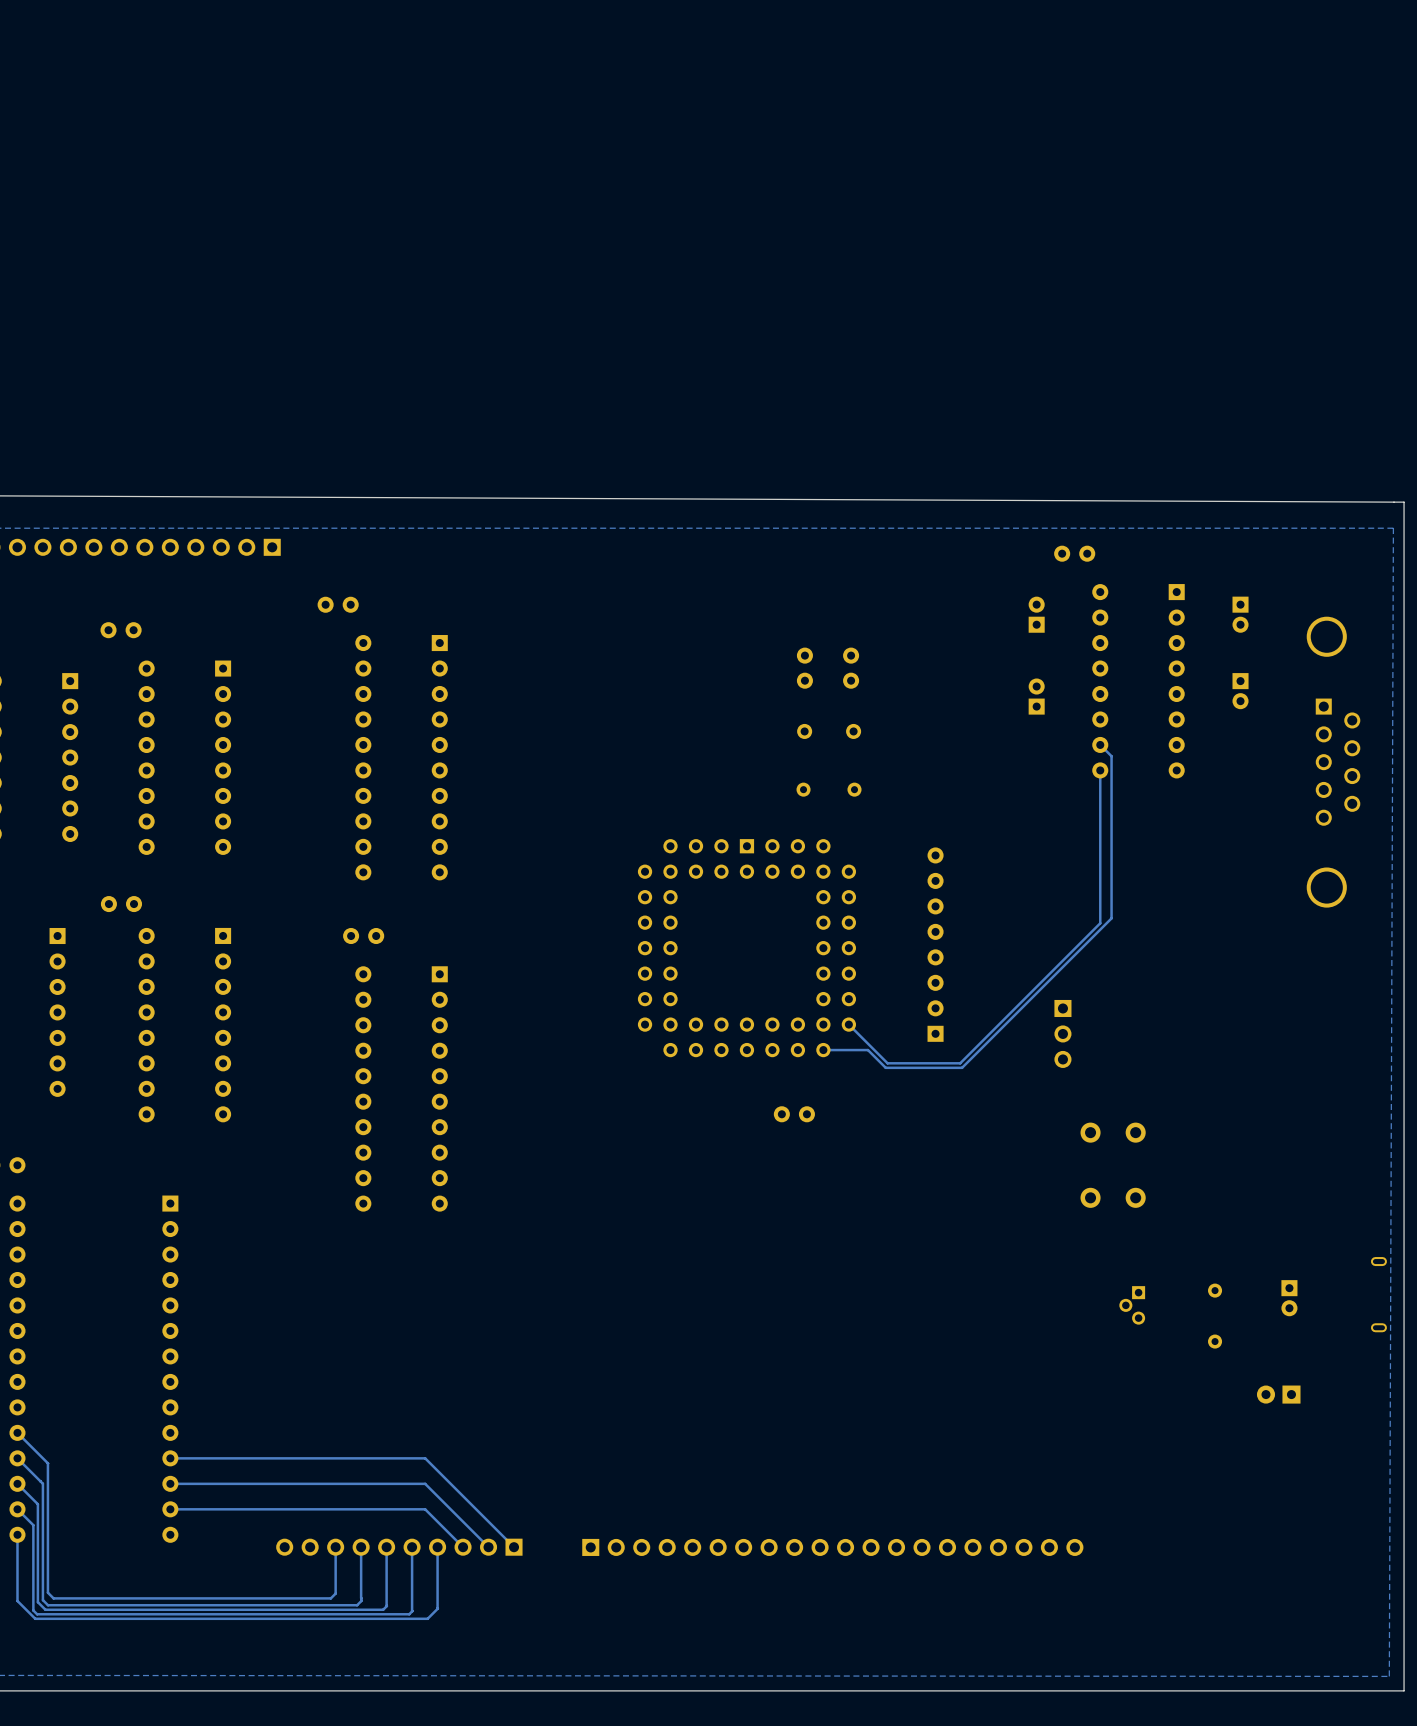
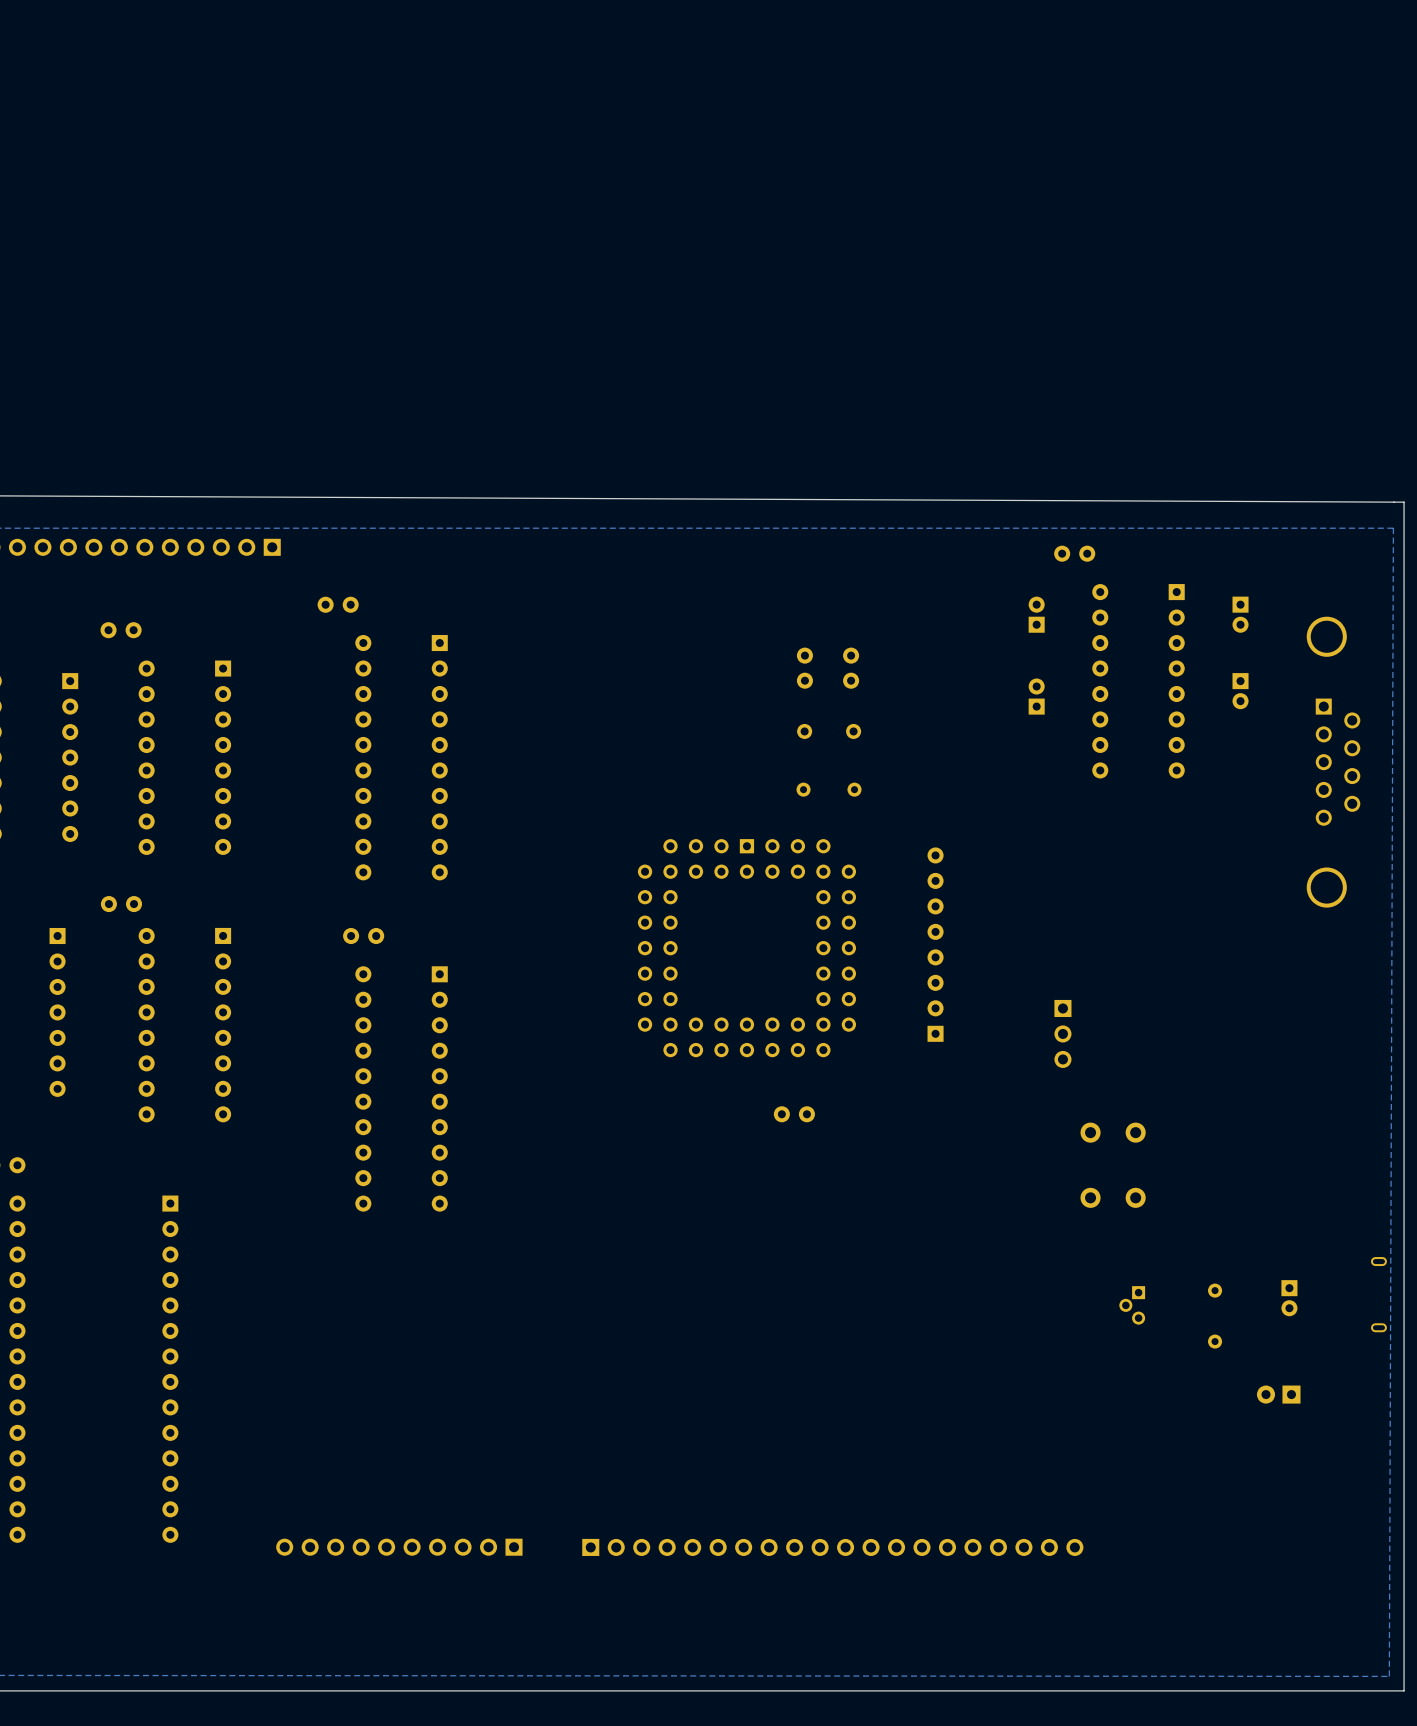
track: (1100, 744) (1111, 756) (1111, 918) (962, 1067) (885, 1067) (867, 1050) (823, 1050) -> none
track: (1100, 770) (1100, 923) (960, 1063) (887, 1063) (848, 1024) -> none
track: (17, 1432) (47, 1463) -> none
track: (17, 1458) (42, 1483) (42, 1600) (48, 1605) (357, 1605) (361, 1600) (361, 1547) -> none
track: (170, 1458) (425, 1458) (514, 1547) -> none
track: (47, 1463) (47, 1592) (53, 1598) (330, 1598) (335, 1593) (335, 1547) -> none
track: (17, 1483) (37, 1504) -> none
track: (170, 1483) (425, 1483) (488, 1547) -> none
track: (37, 1504) (37, 1602) (45, 1609) (383, 1609) (386, 1606) (386, 1547) -> none
track: (17, 1509) (33, 1525) (33, 1610) (37, 1614) (409, 1614) (412, 1611) (412, 1547) -> none
track: (170, 1509) (425, 1509) (463, 1547) -> none
track: (17, 1534) (17, 1601) (35, 1618) (427, 1618) (437, 1608) (437, 1547) -> none

